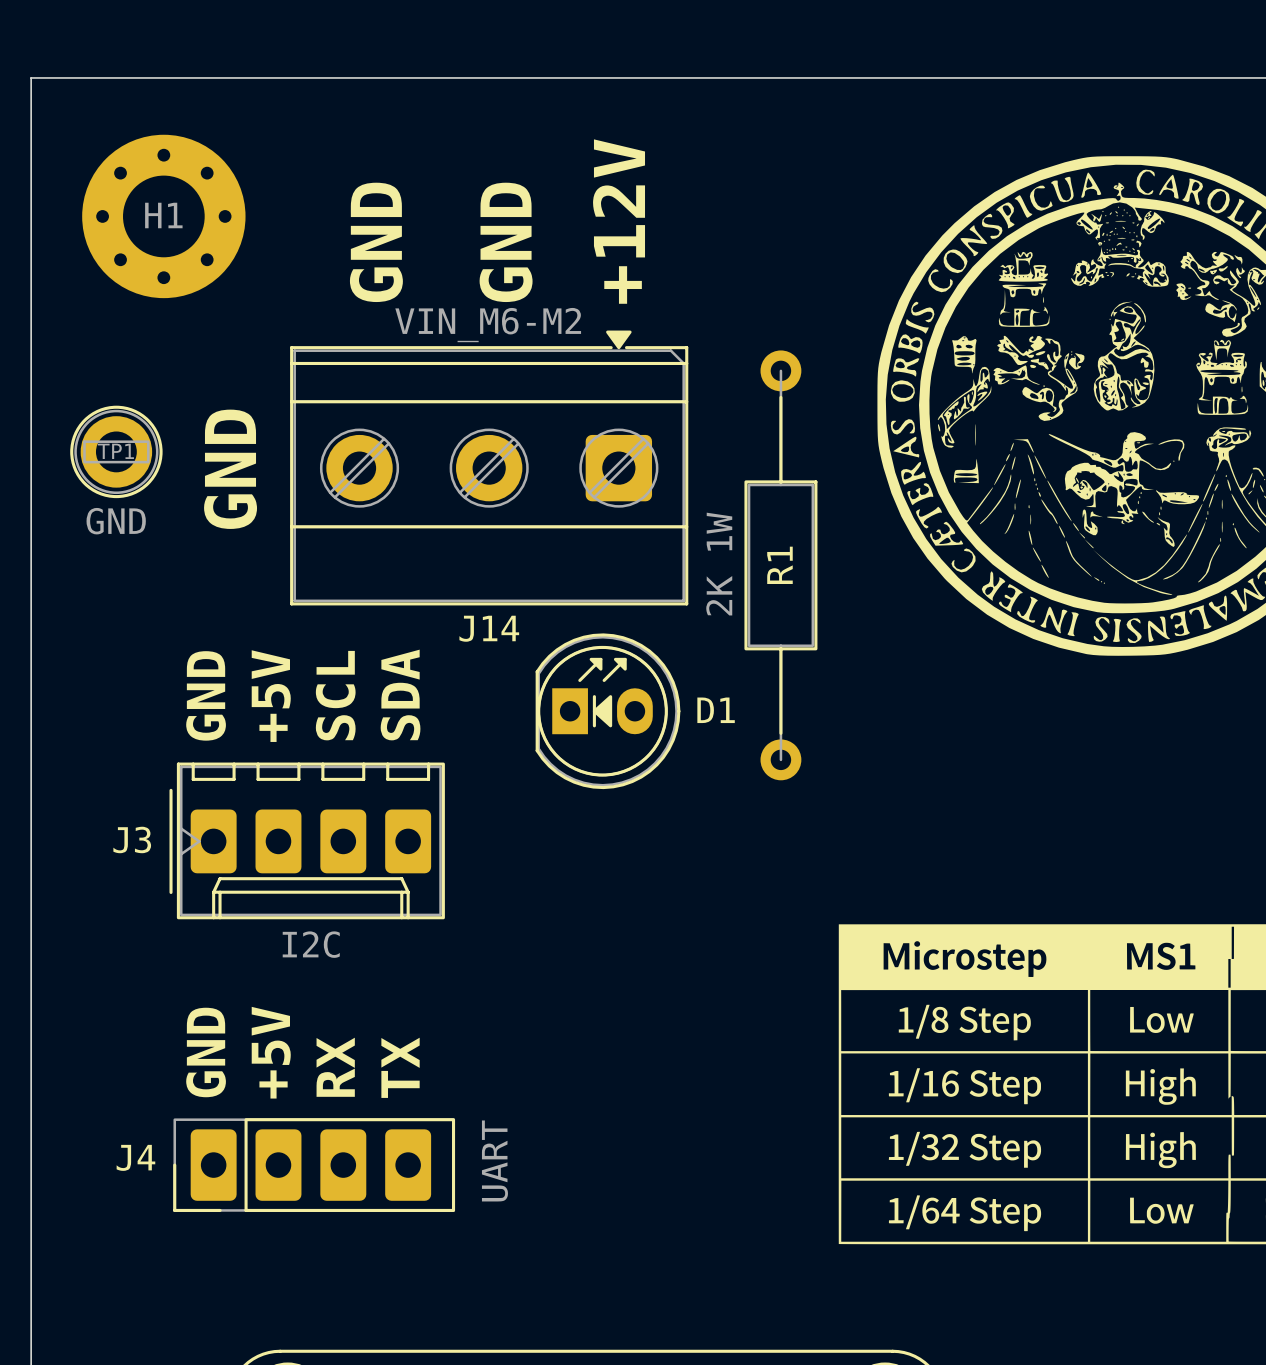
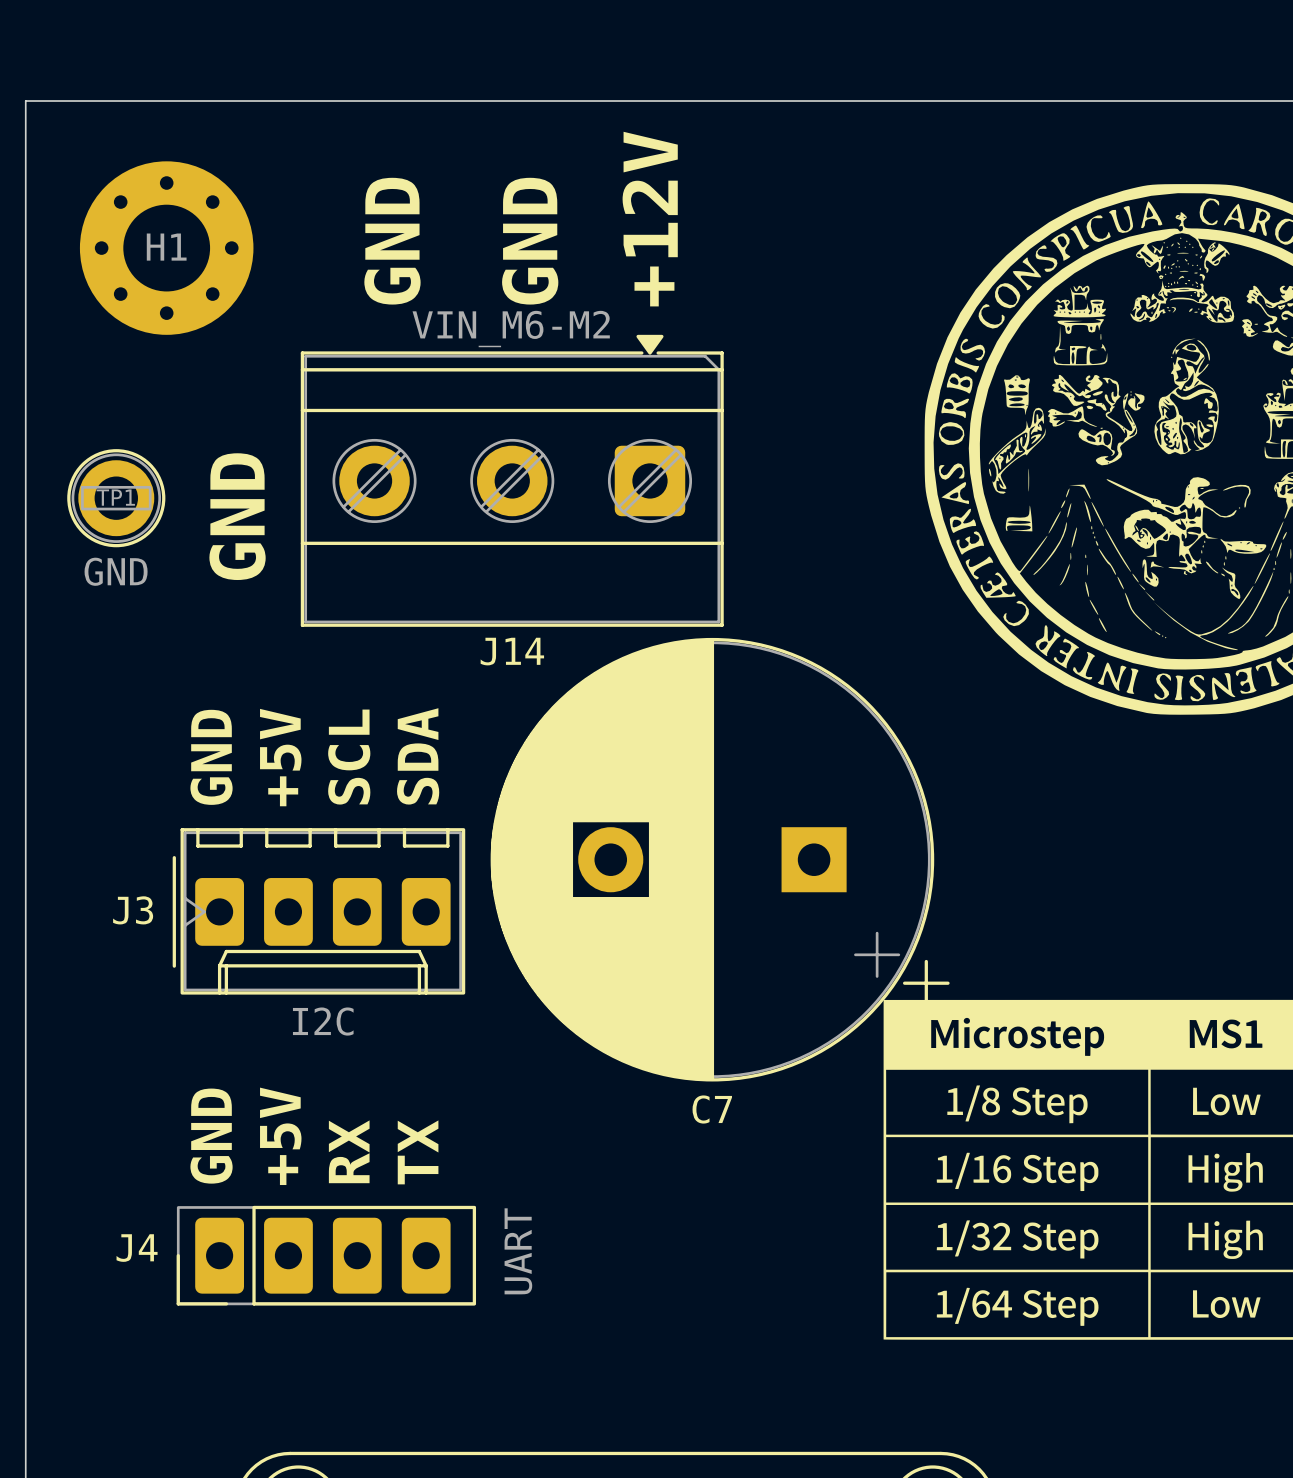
text position: +12V (619, 221) -> +12V (650, 219)
text position: GND (376, 242) -> GND (392, 241)
text position: GND (506, 242) -> GND (530, 241)
J14 position: (489, 467) -> (512, 480)
R1: 2K 1W (780, 565) -> none
D1: (608, 711) -> none
C7: none -> (720, 859)

